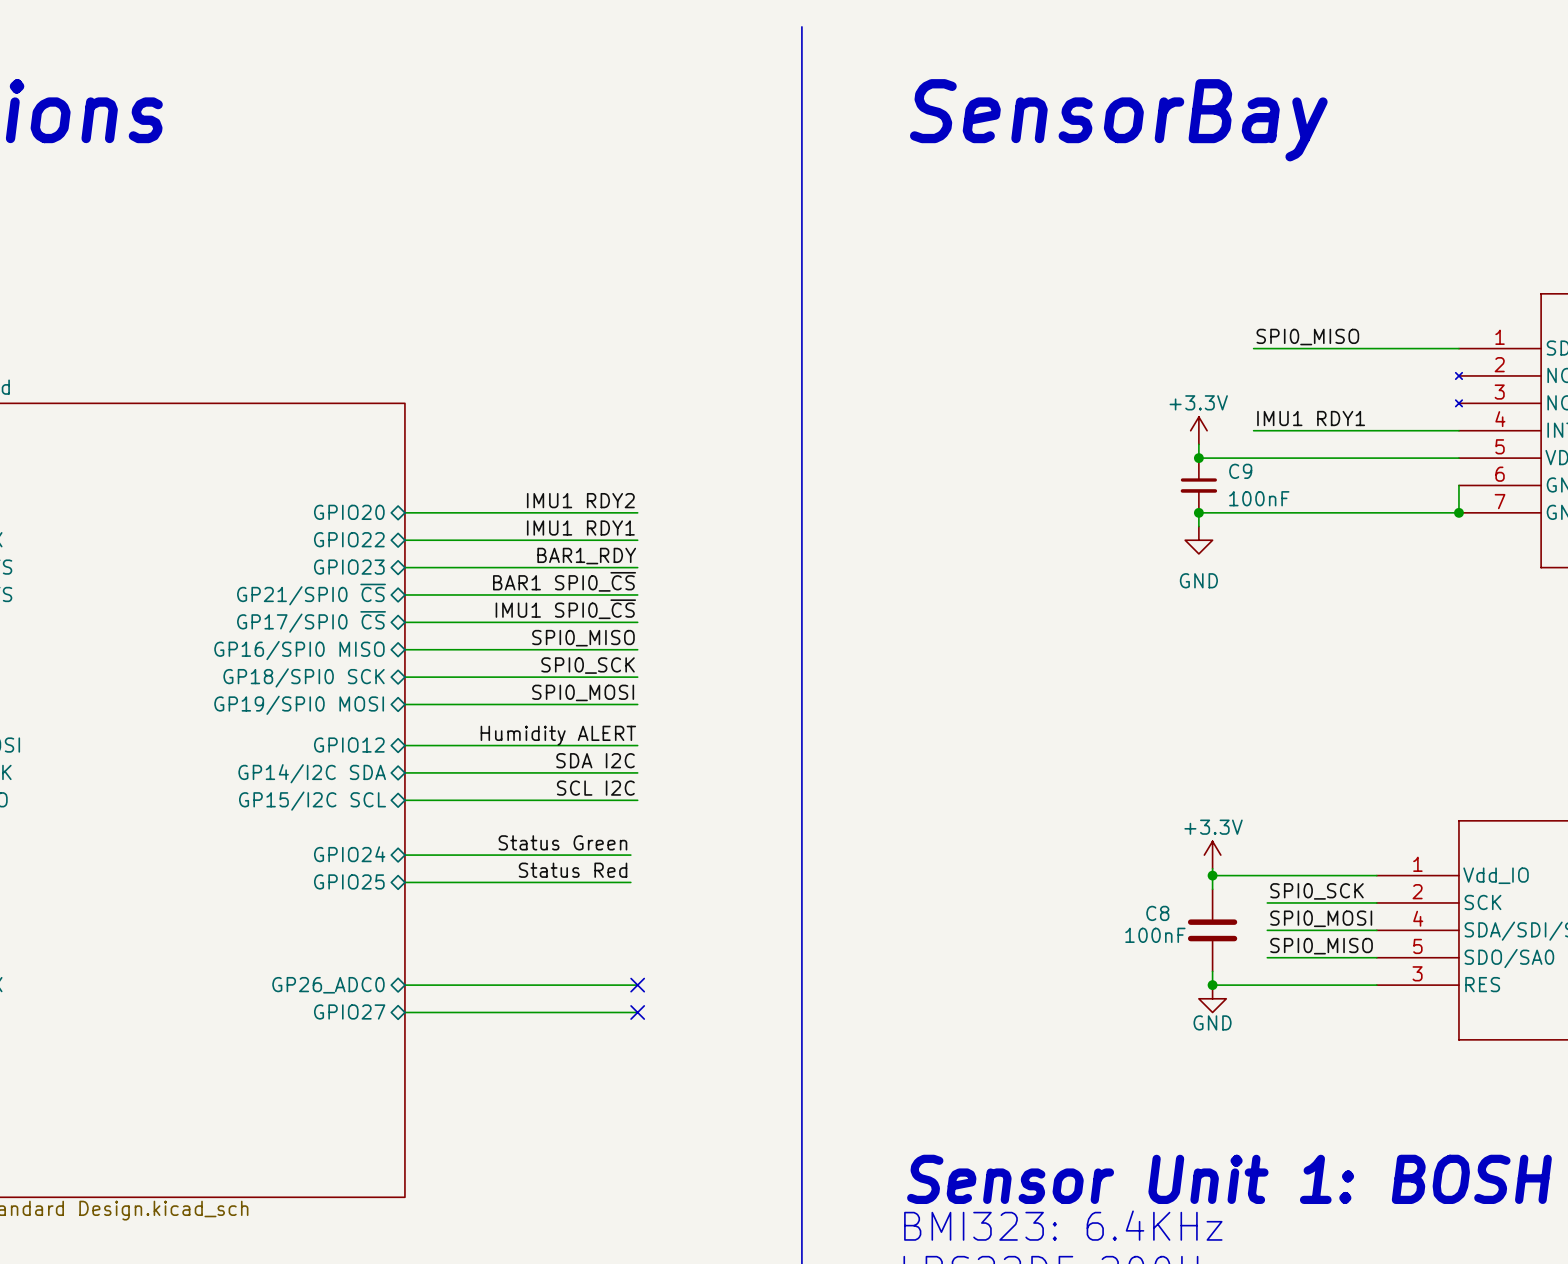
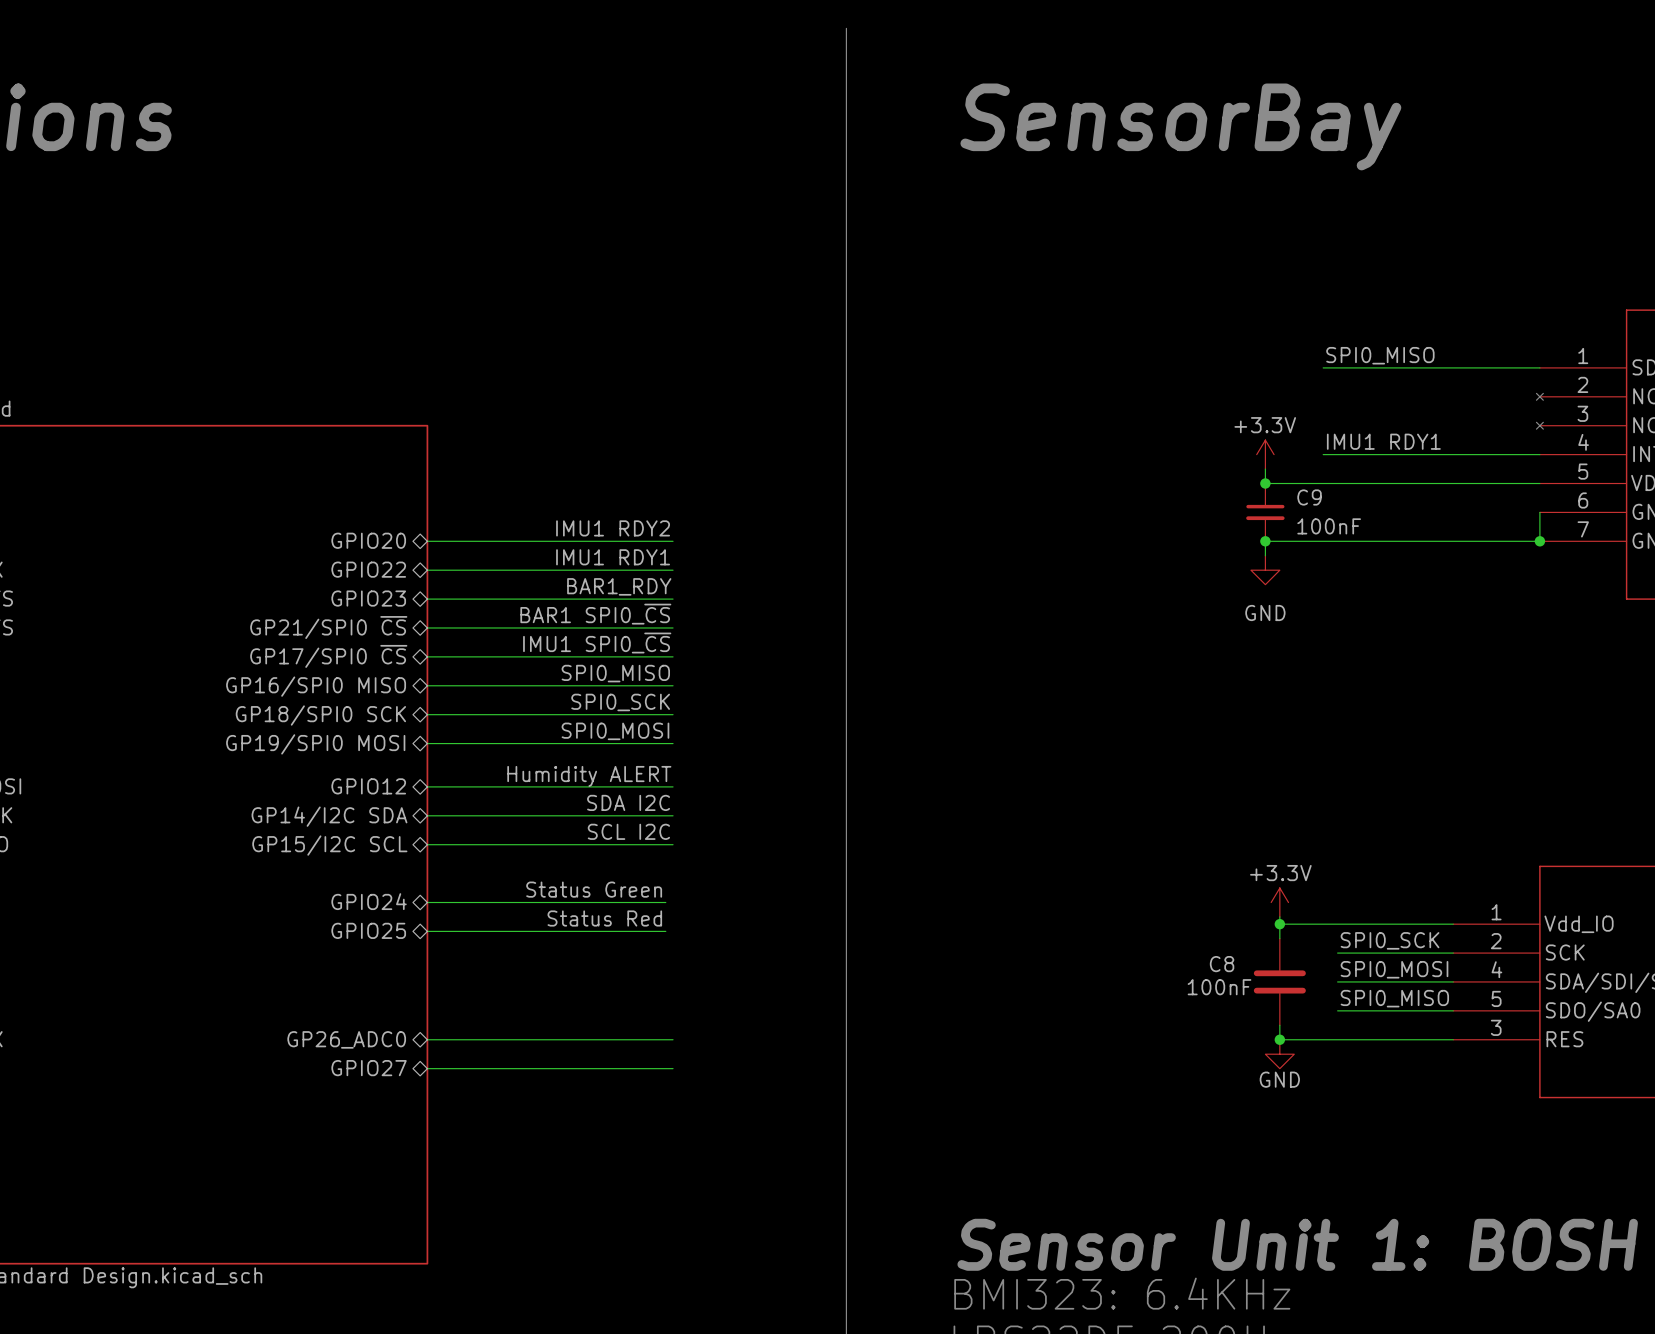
no-connect mark: (637, 985) -> none
no-connect mark: (637, 1012) -> none

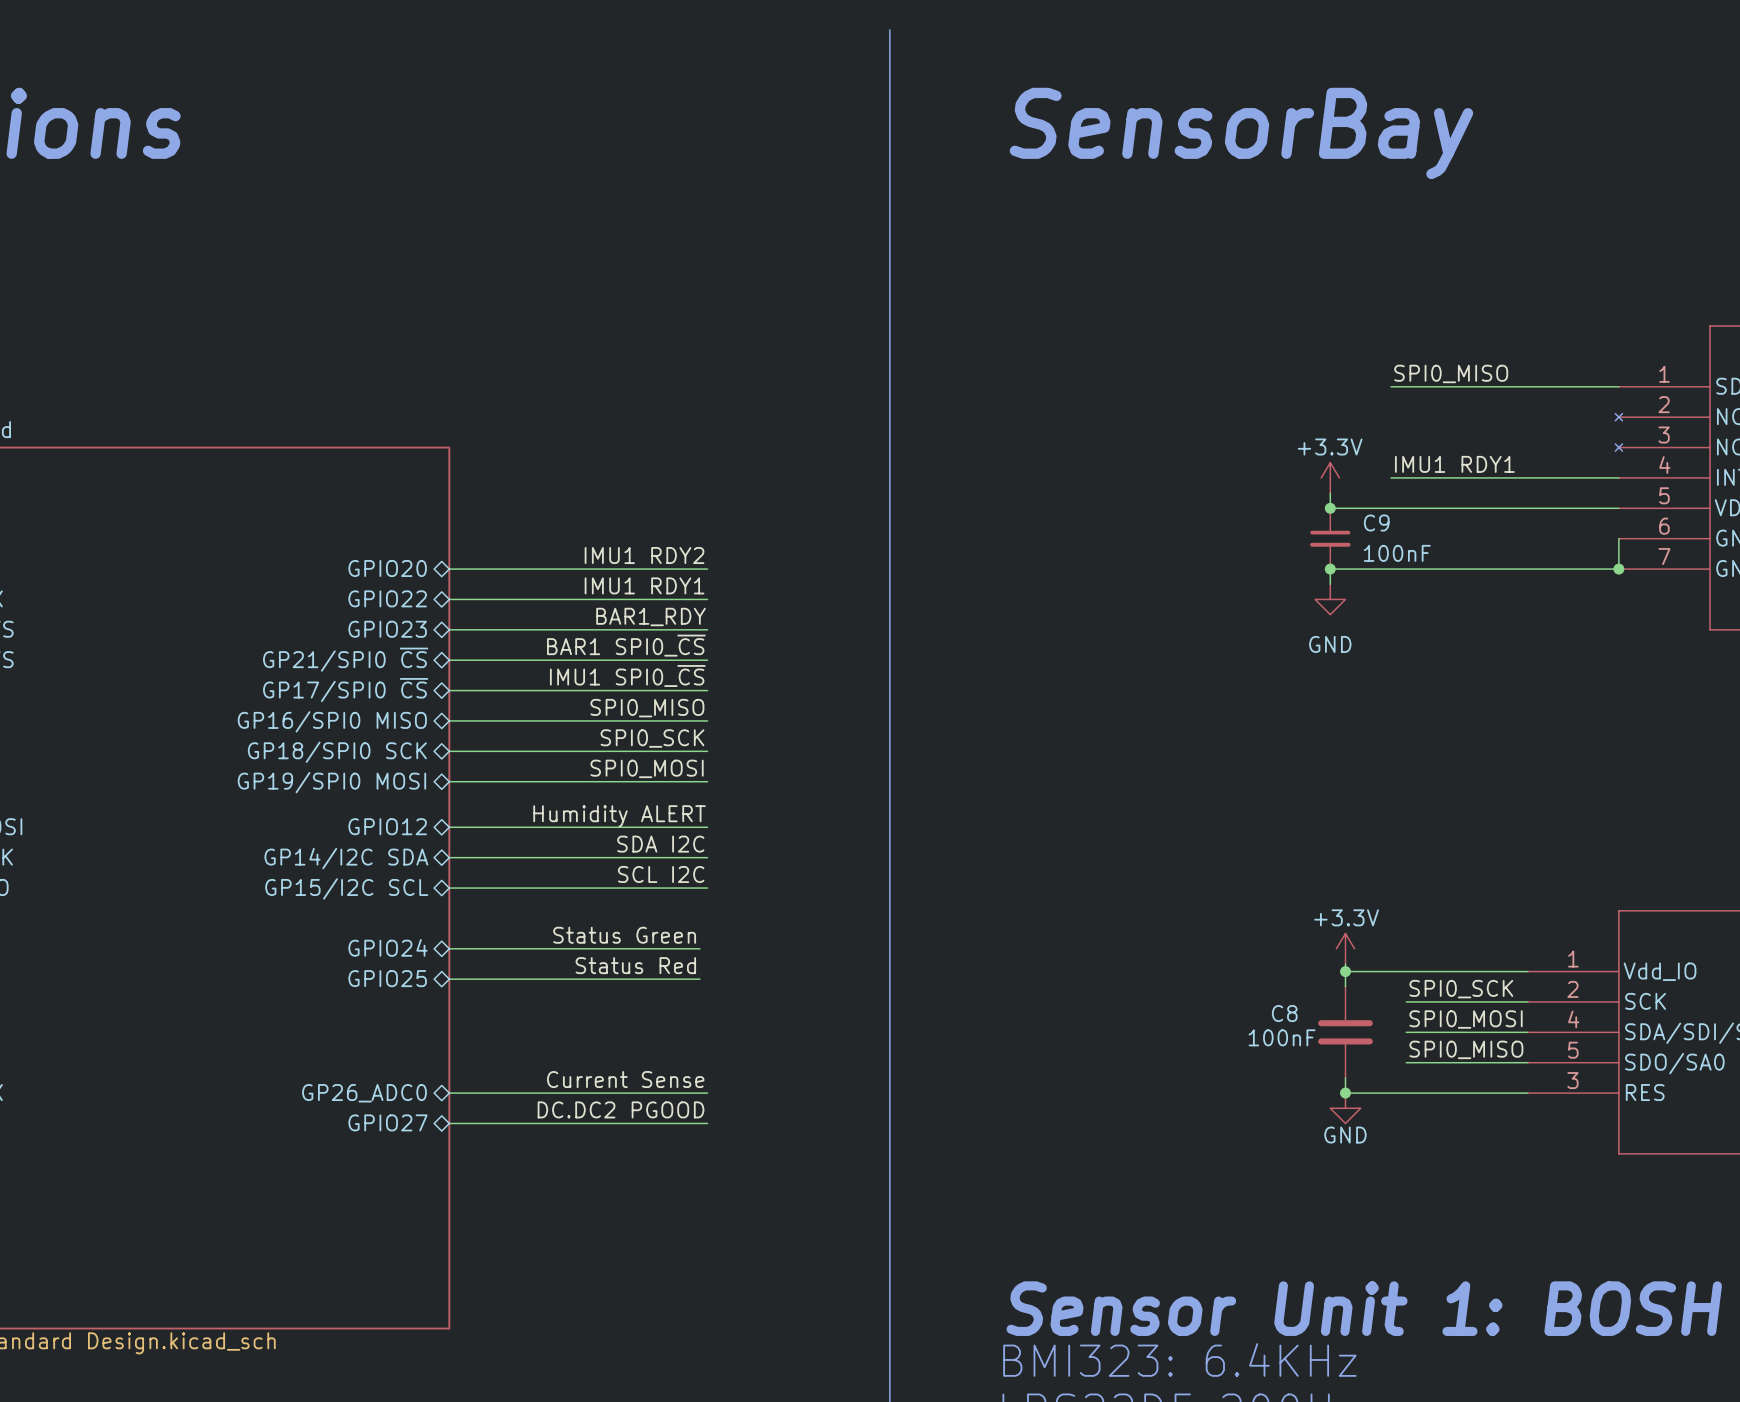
label: none -> Current Sense (625, 1079)
label: none -> DC.DC2 PGOOD (621, 1109)

